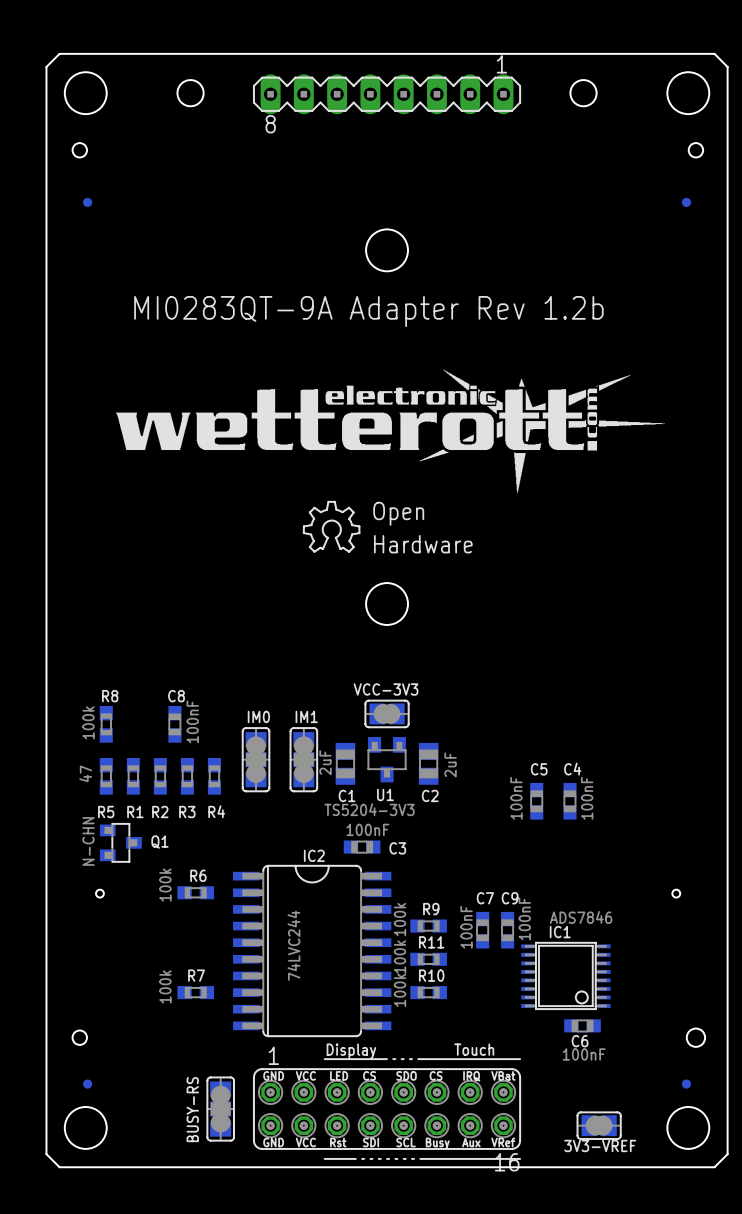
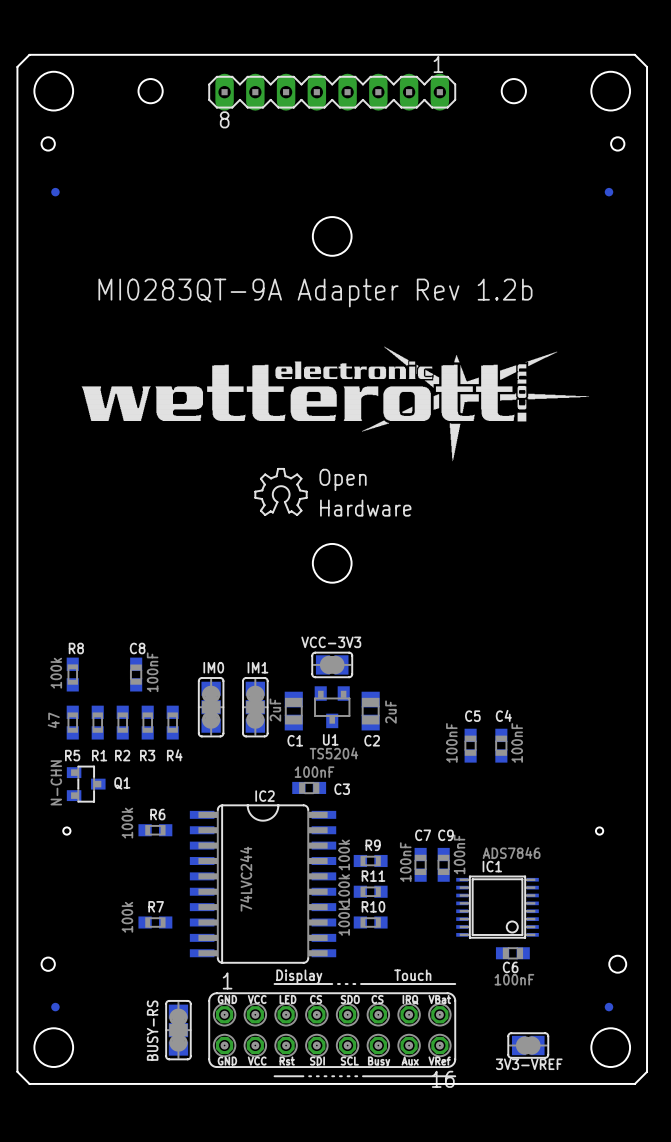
U1 value: TS5204-3V3 (369, 809) -> TS5204 (333, 753)

